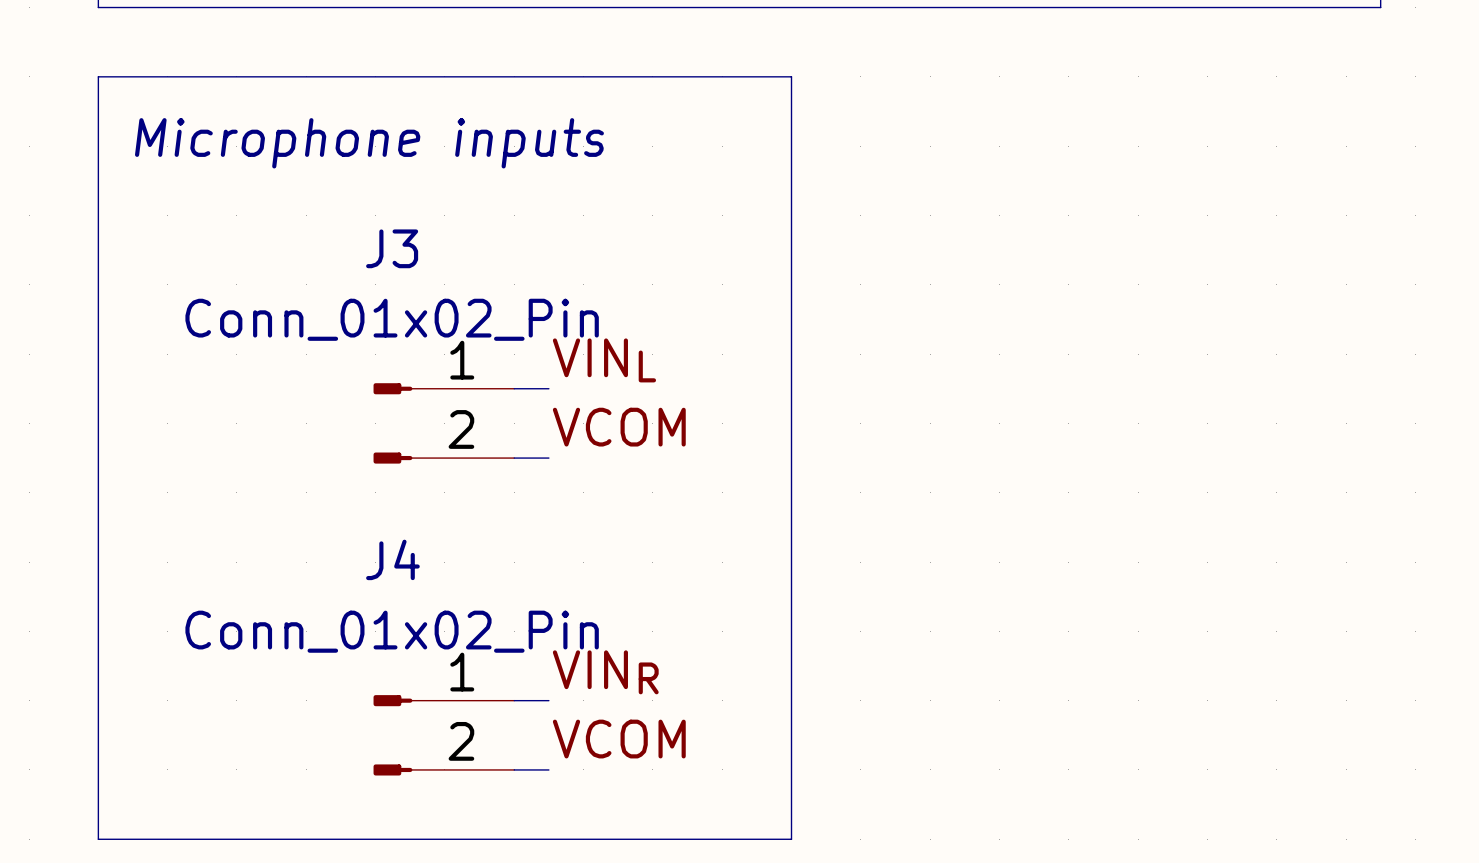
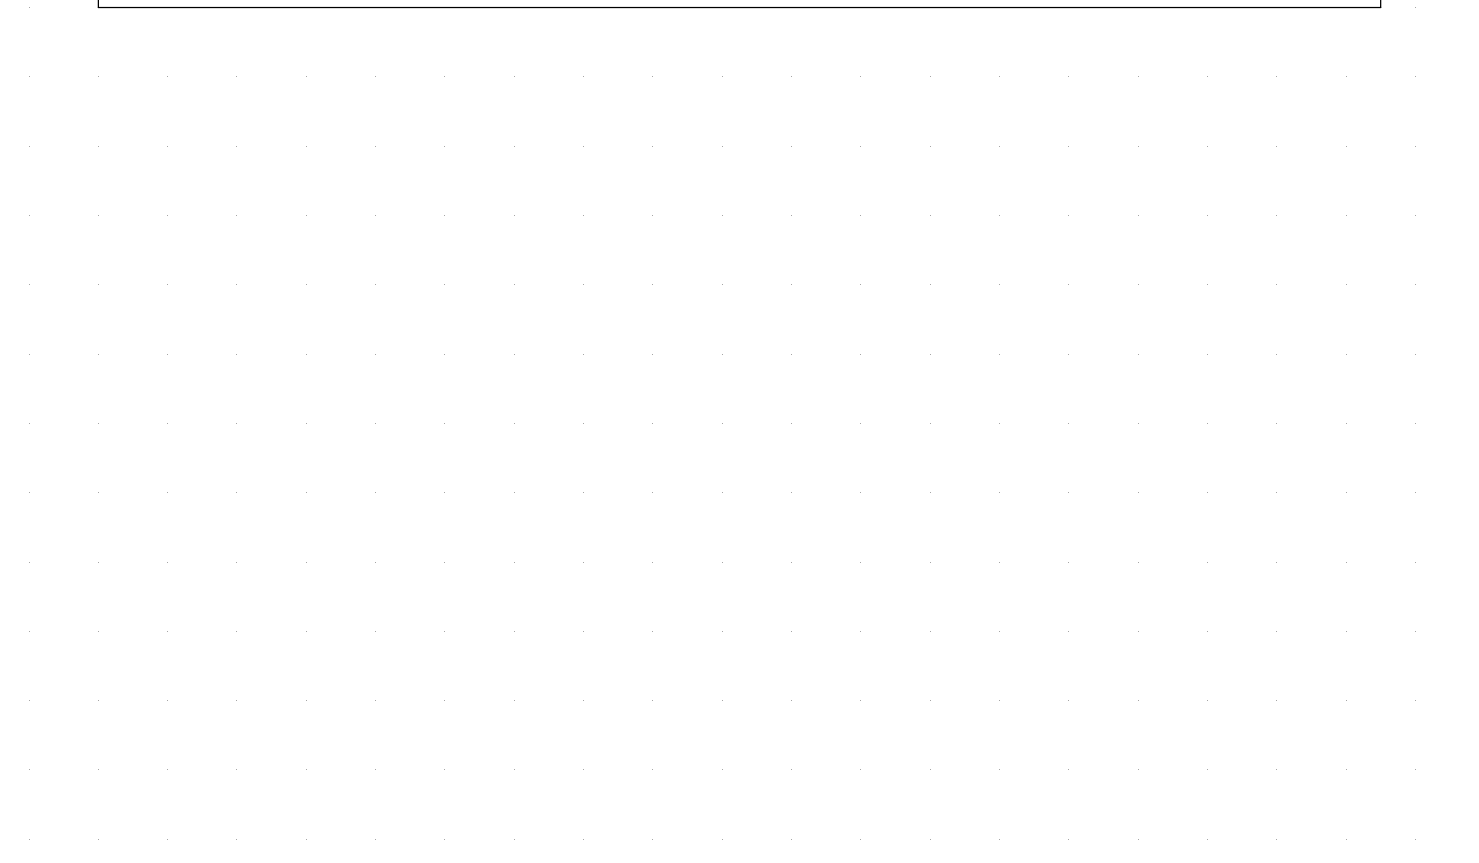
line: (98, 76) (791, 76) (791, 839) (98, 839) (98, 76) -> none
text: Microphone inputs (369, 143) -> none
label: VINL (604, 360) -> none
wire: (514, 388) (548, 388) -> none
J3: Conn_01x02_Pin (443, 423) -> none
label: VCOM (619, 427) -> none
wire: (514, 458) (548, 458) -> none
label: VINR (605, 672) -> none
wire: (514, 700) (548, 700) -> none
J4: Conn_01x02_Pin (443, 735) -> none
label: VCOM (619, 739) -> none
wire: (514, 769) (548, 769) -> none

